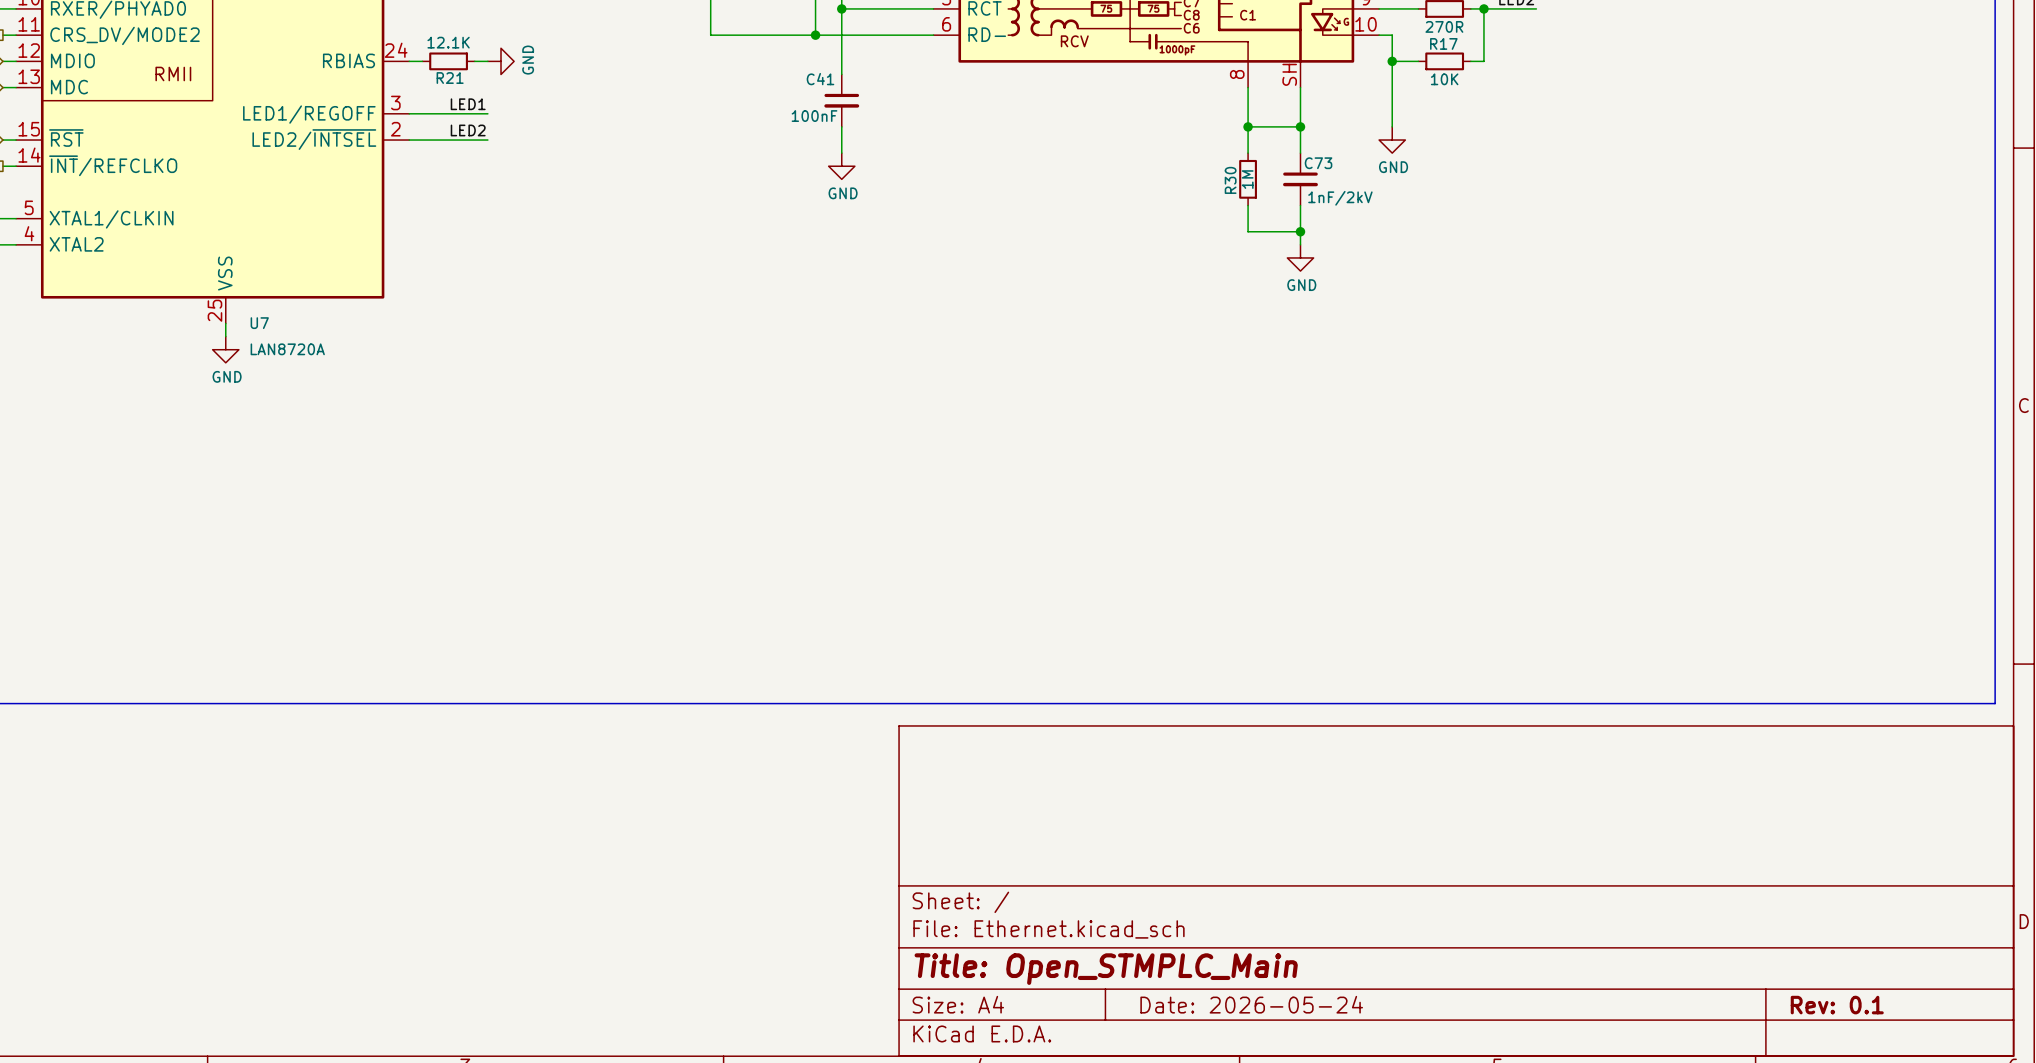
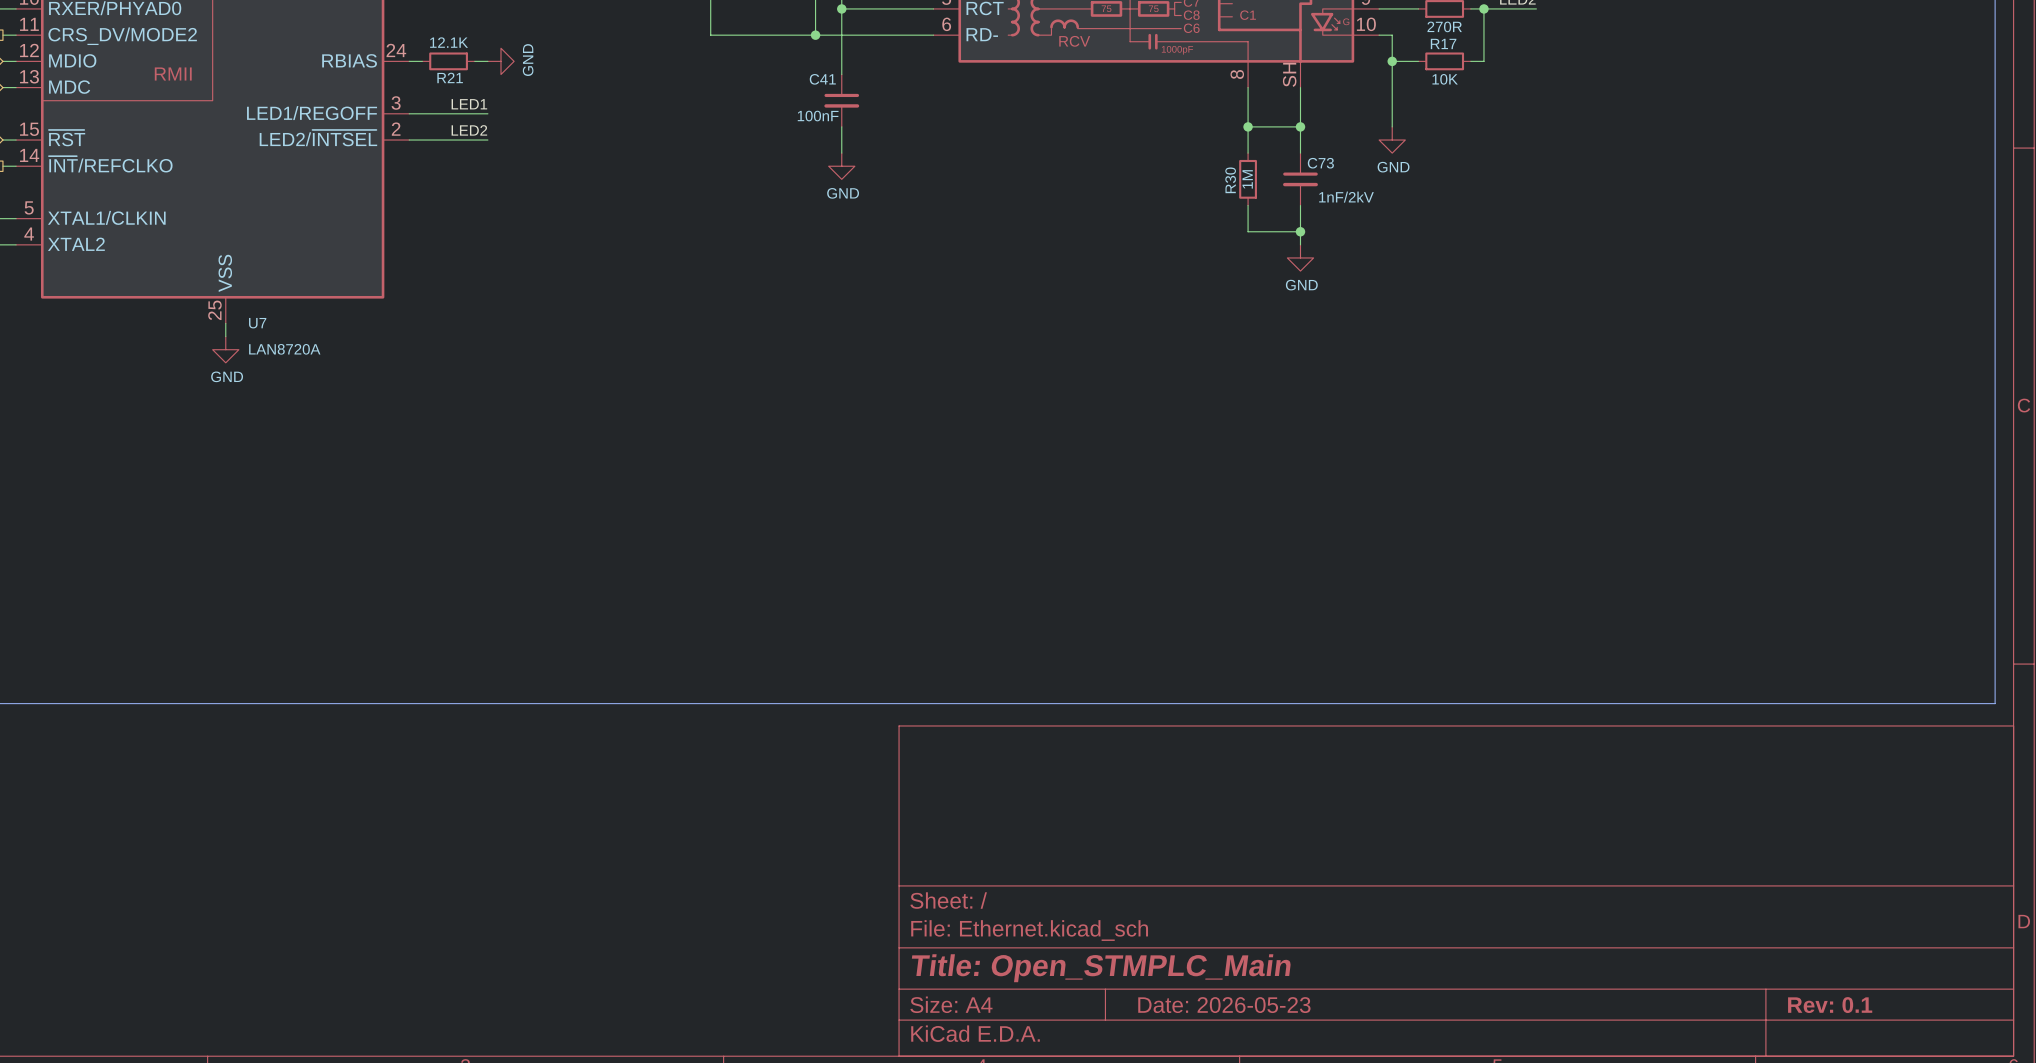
title block: Date: 2026-05-24 (1251, 1004) -> Date: 2026-05-23 (1224, 1005)

